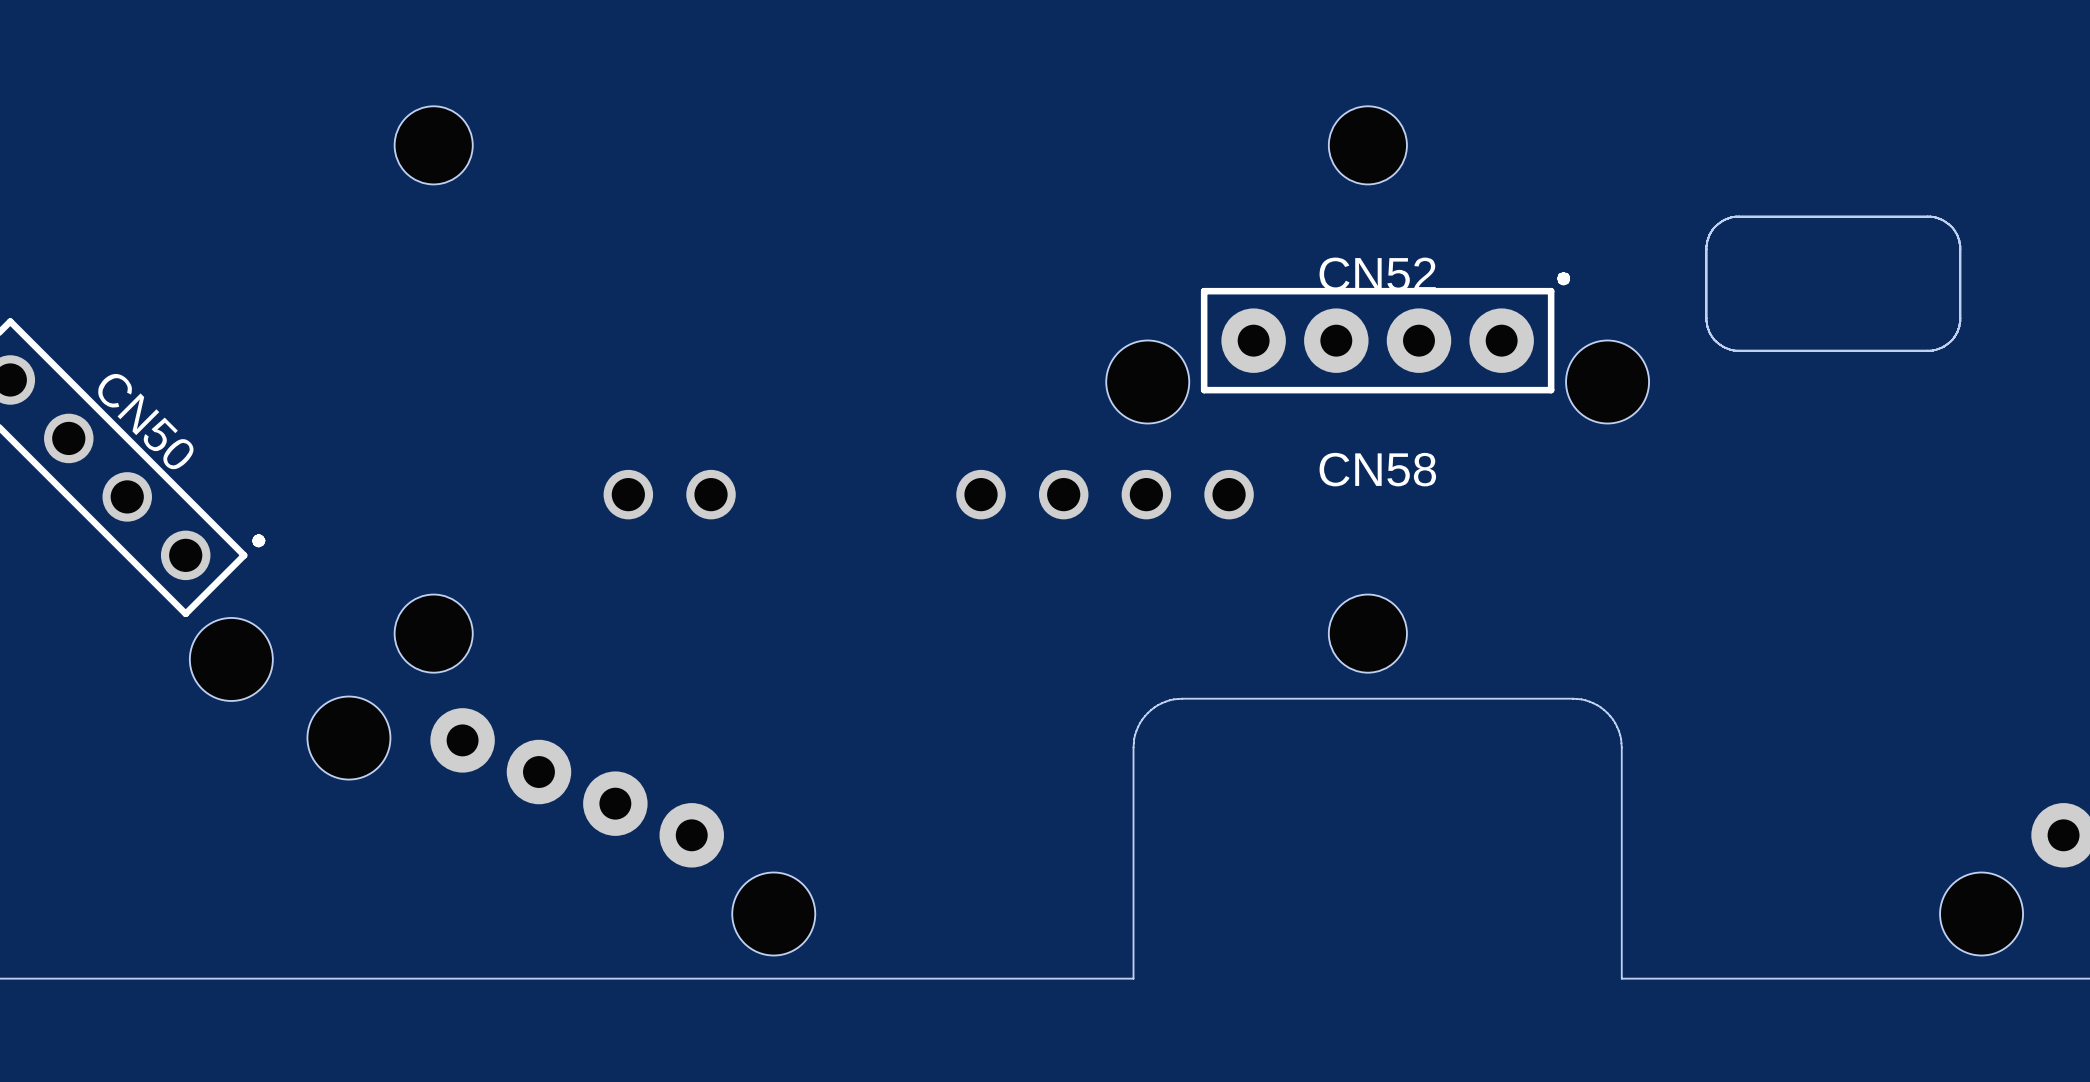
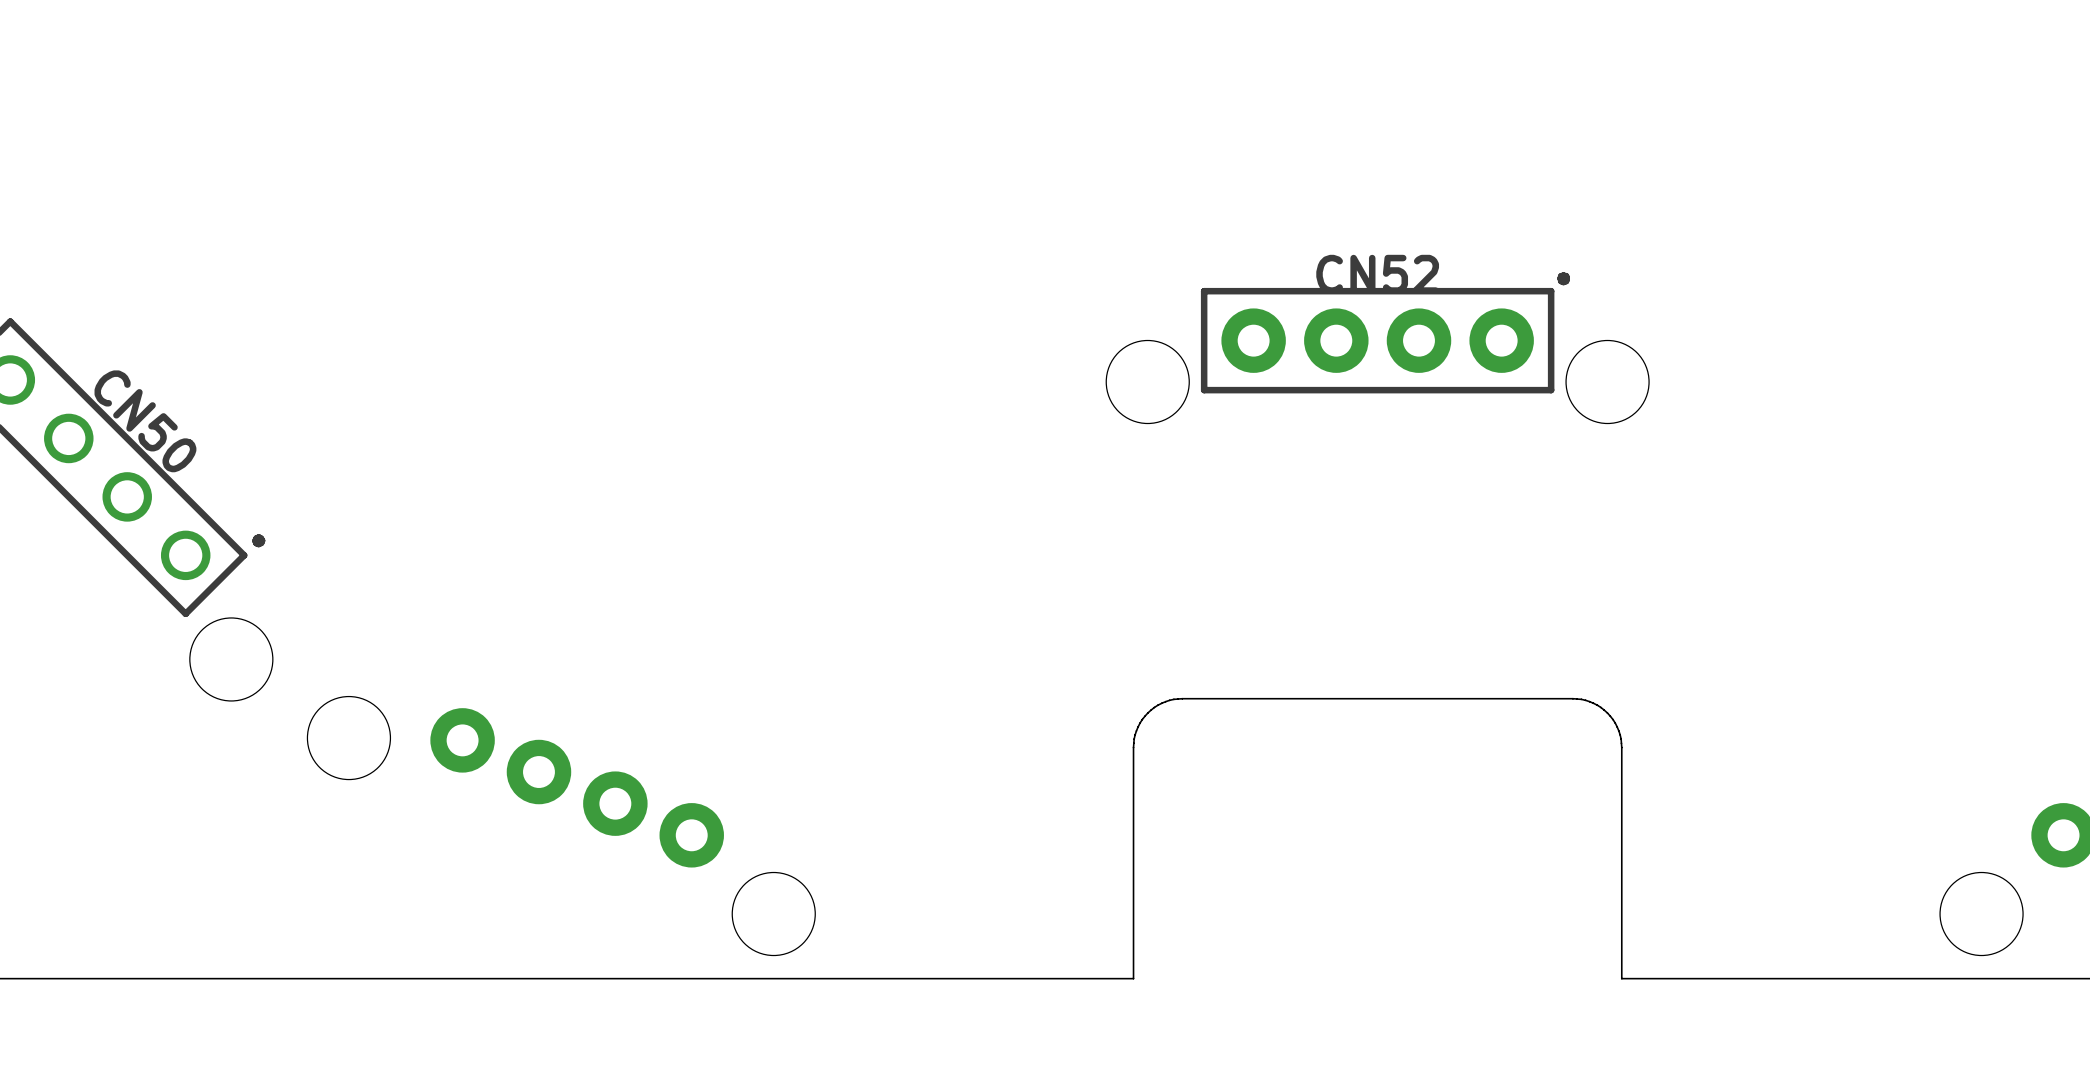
board edge: (1736, 216) (1930, 216) (1944, 220) (1954, 230) (1960, 246) (1960, 321) (1957, 332) (1952, 339) (1944, 346) (1930, 350) (1736, 350) (1722, 346) (1712, 337) (1706, 321) (1706, 246) (1709, 235) (1715, 226) (1725, 219) (1736, 216) -> none
CN58: (1177, 389) -> none

